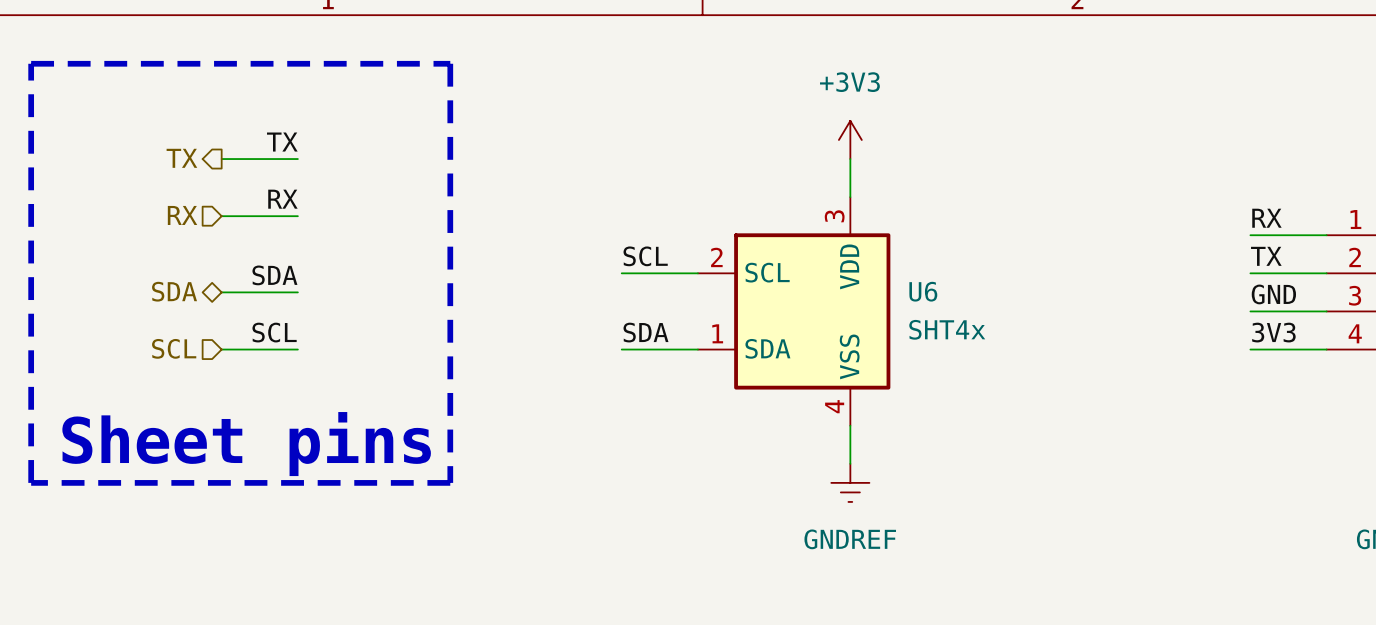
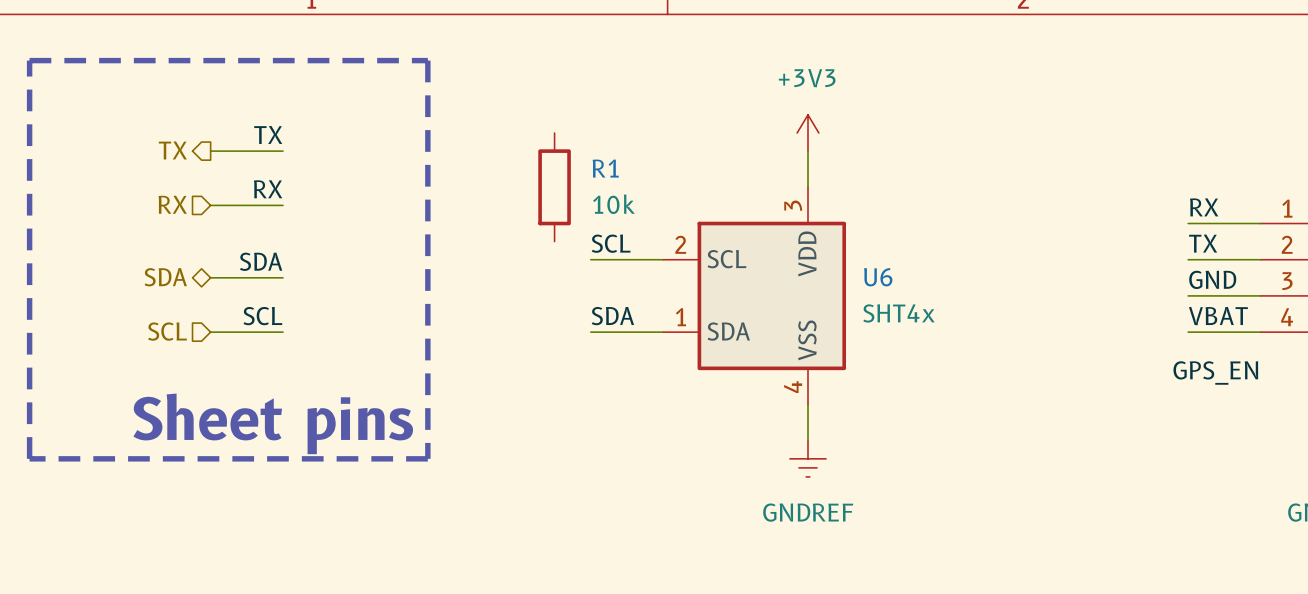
R1: none -> 10k (554, 187)
label: 3V3 (1273, 332) -> VBAT (1218, 316)
label: none -> GPS_EN (1215, 372)

